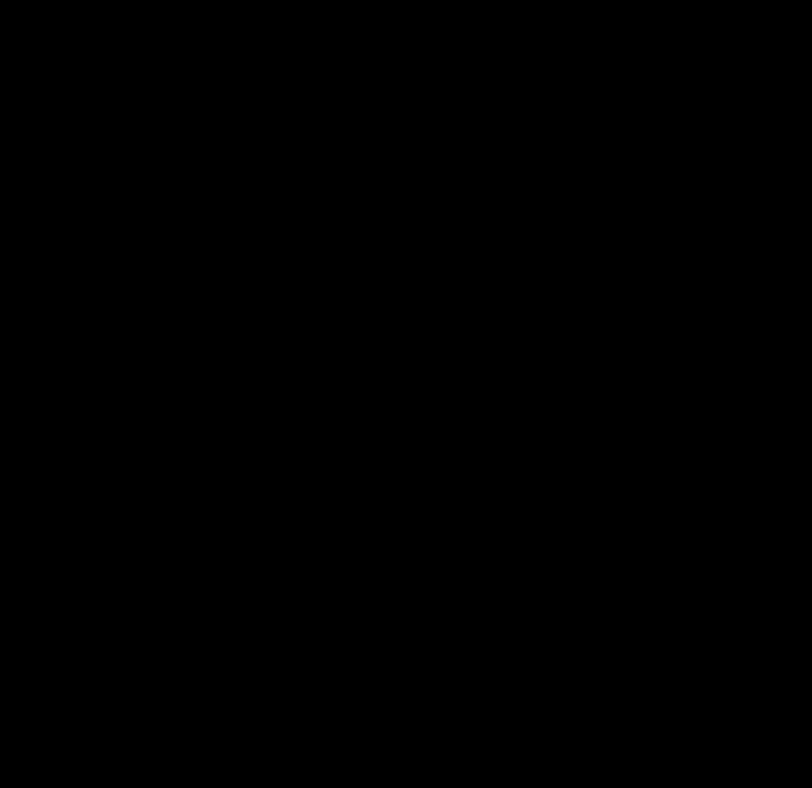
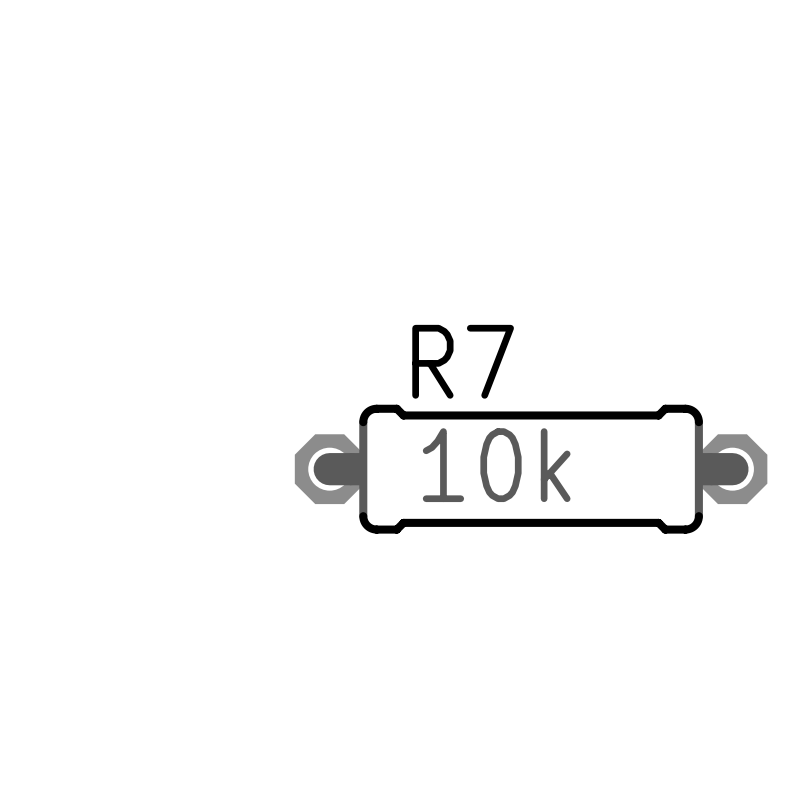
R7: none -> 10k (531, 469)

